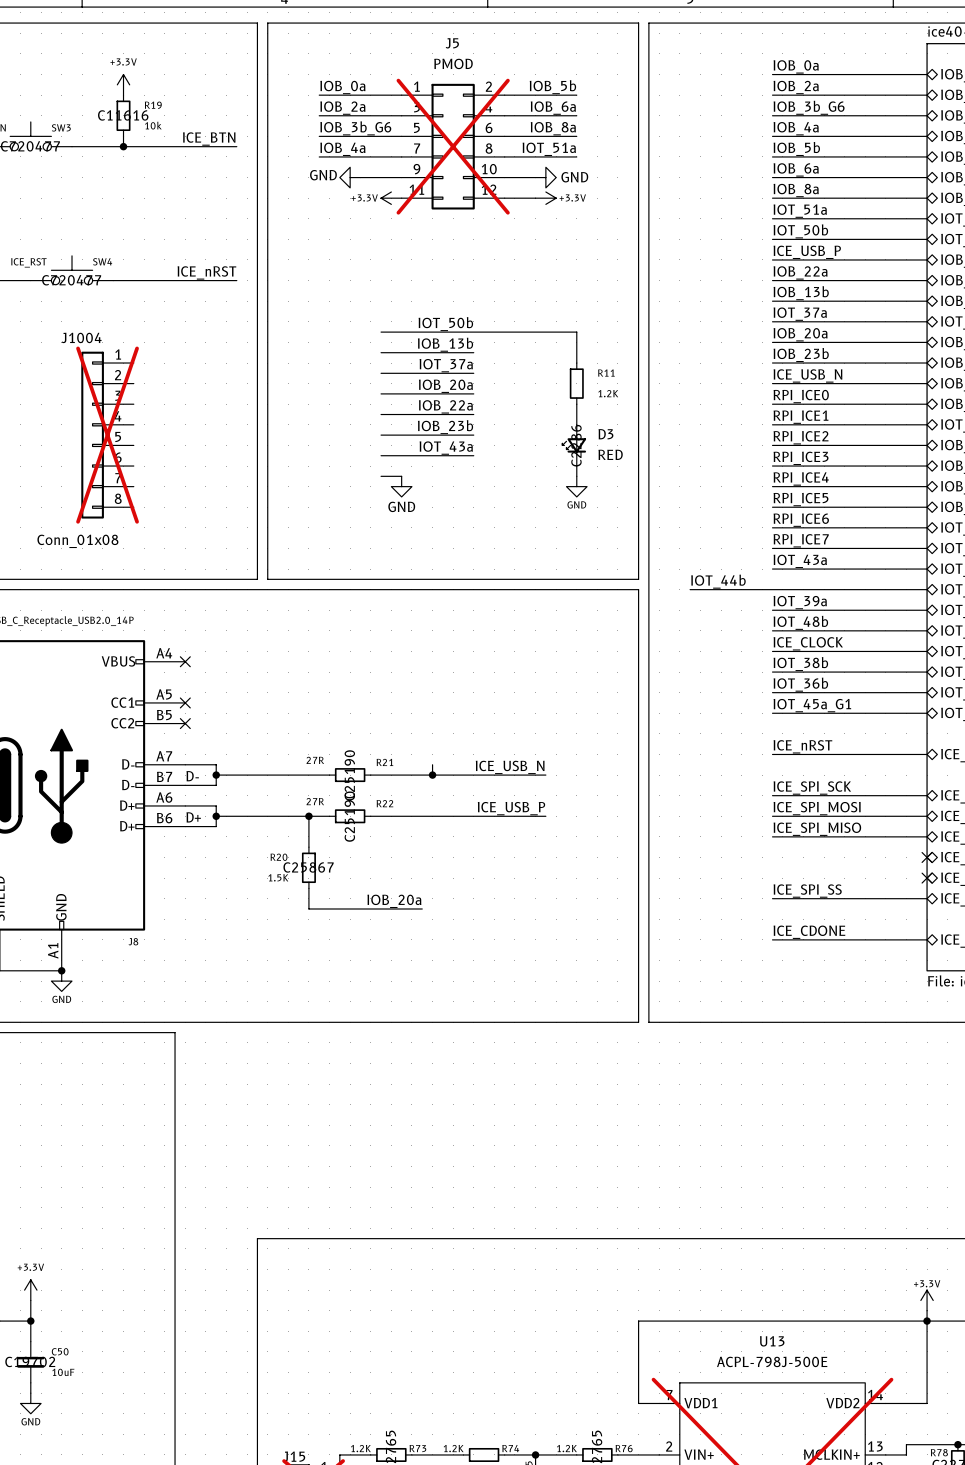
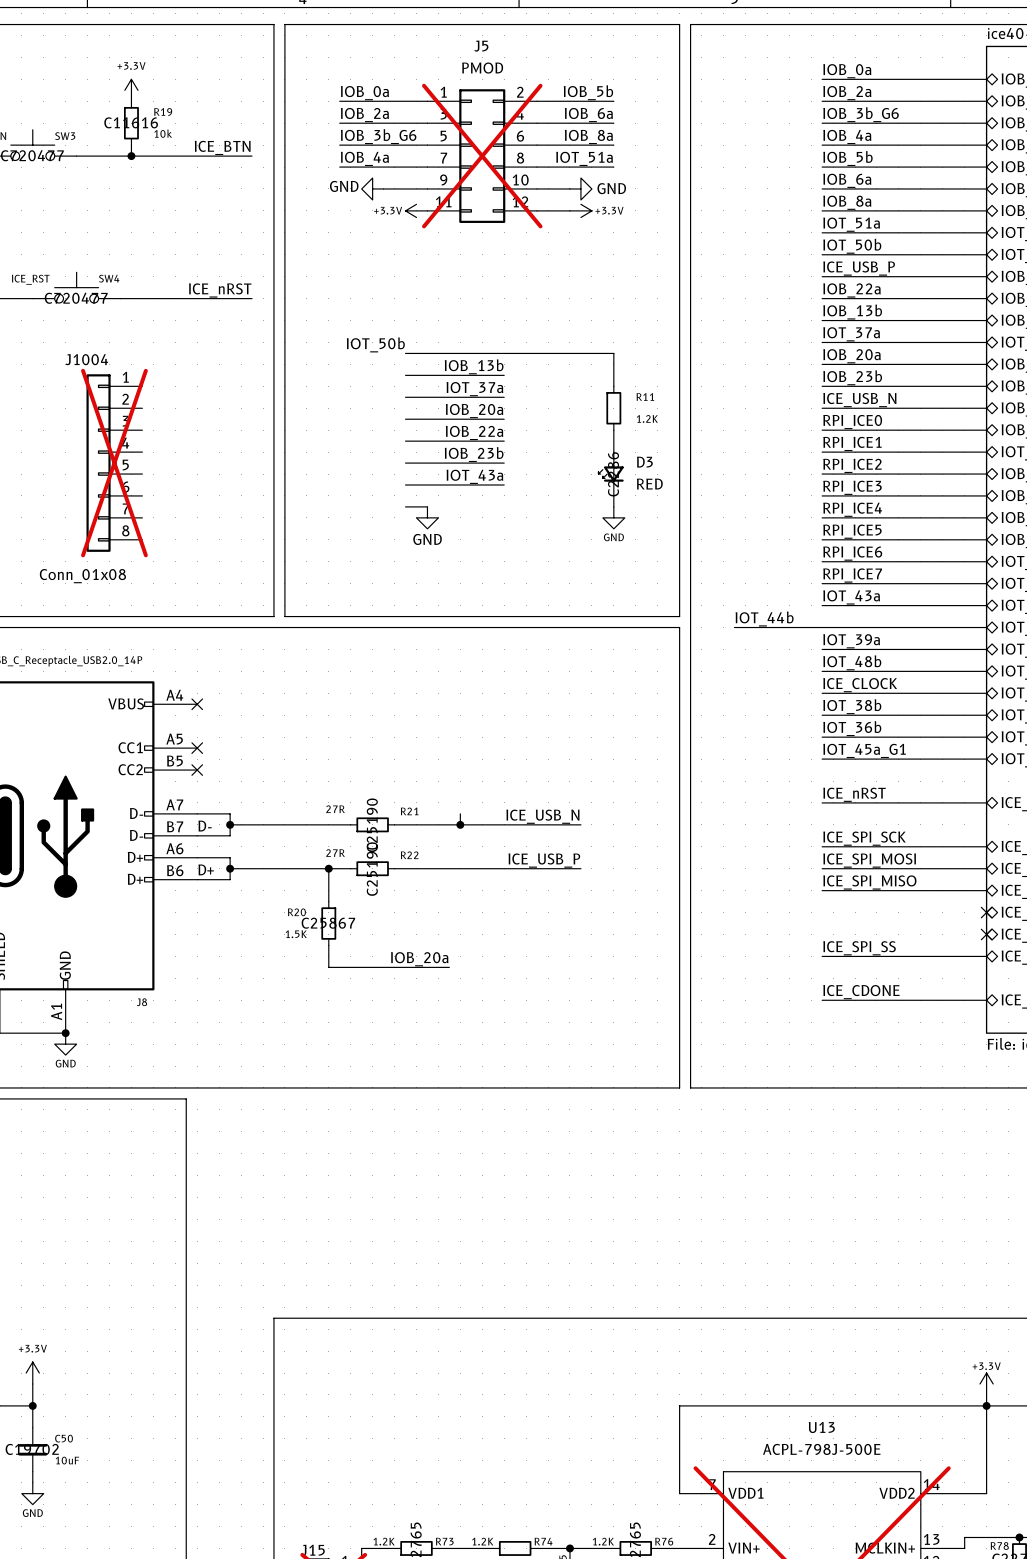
label position: IOT_50b (445, 324) -> IOT_50b (375, 344)

